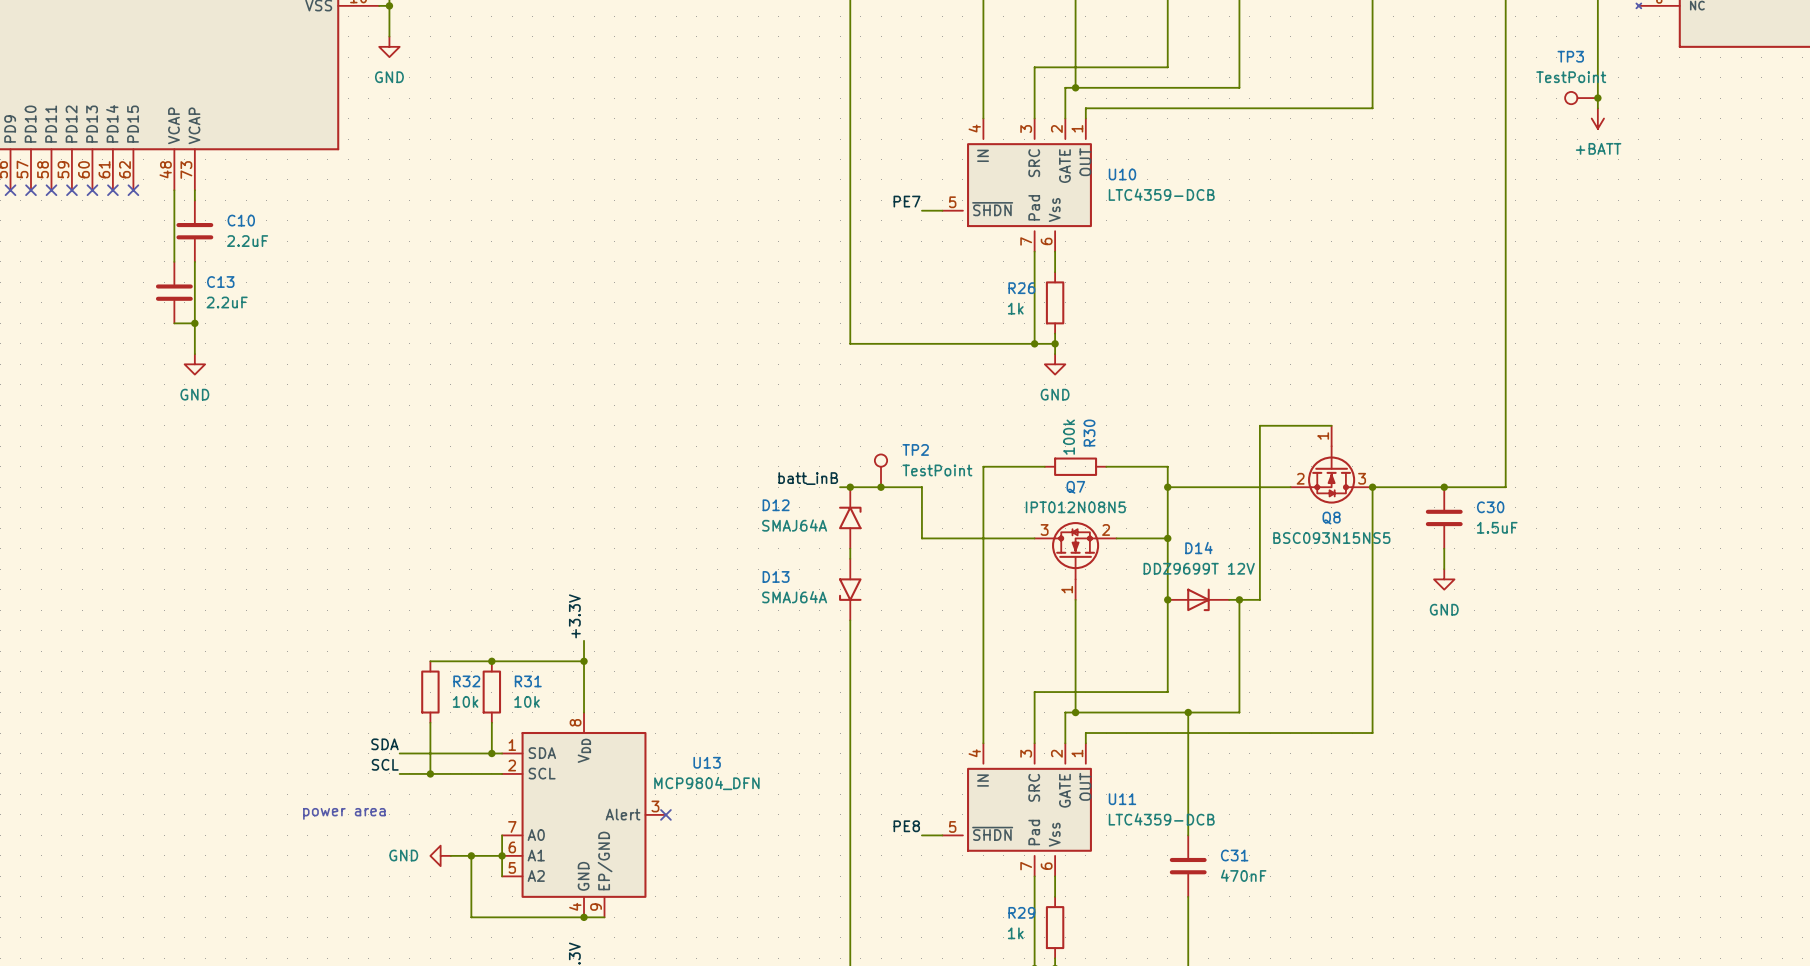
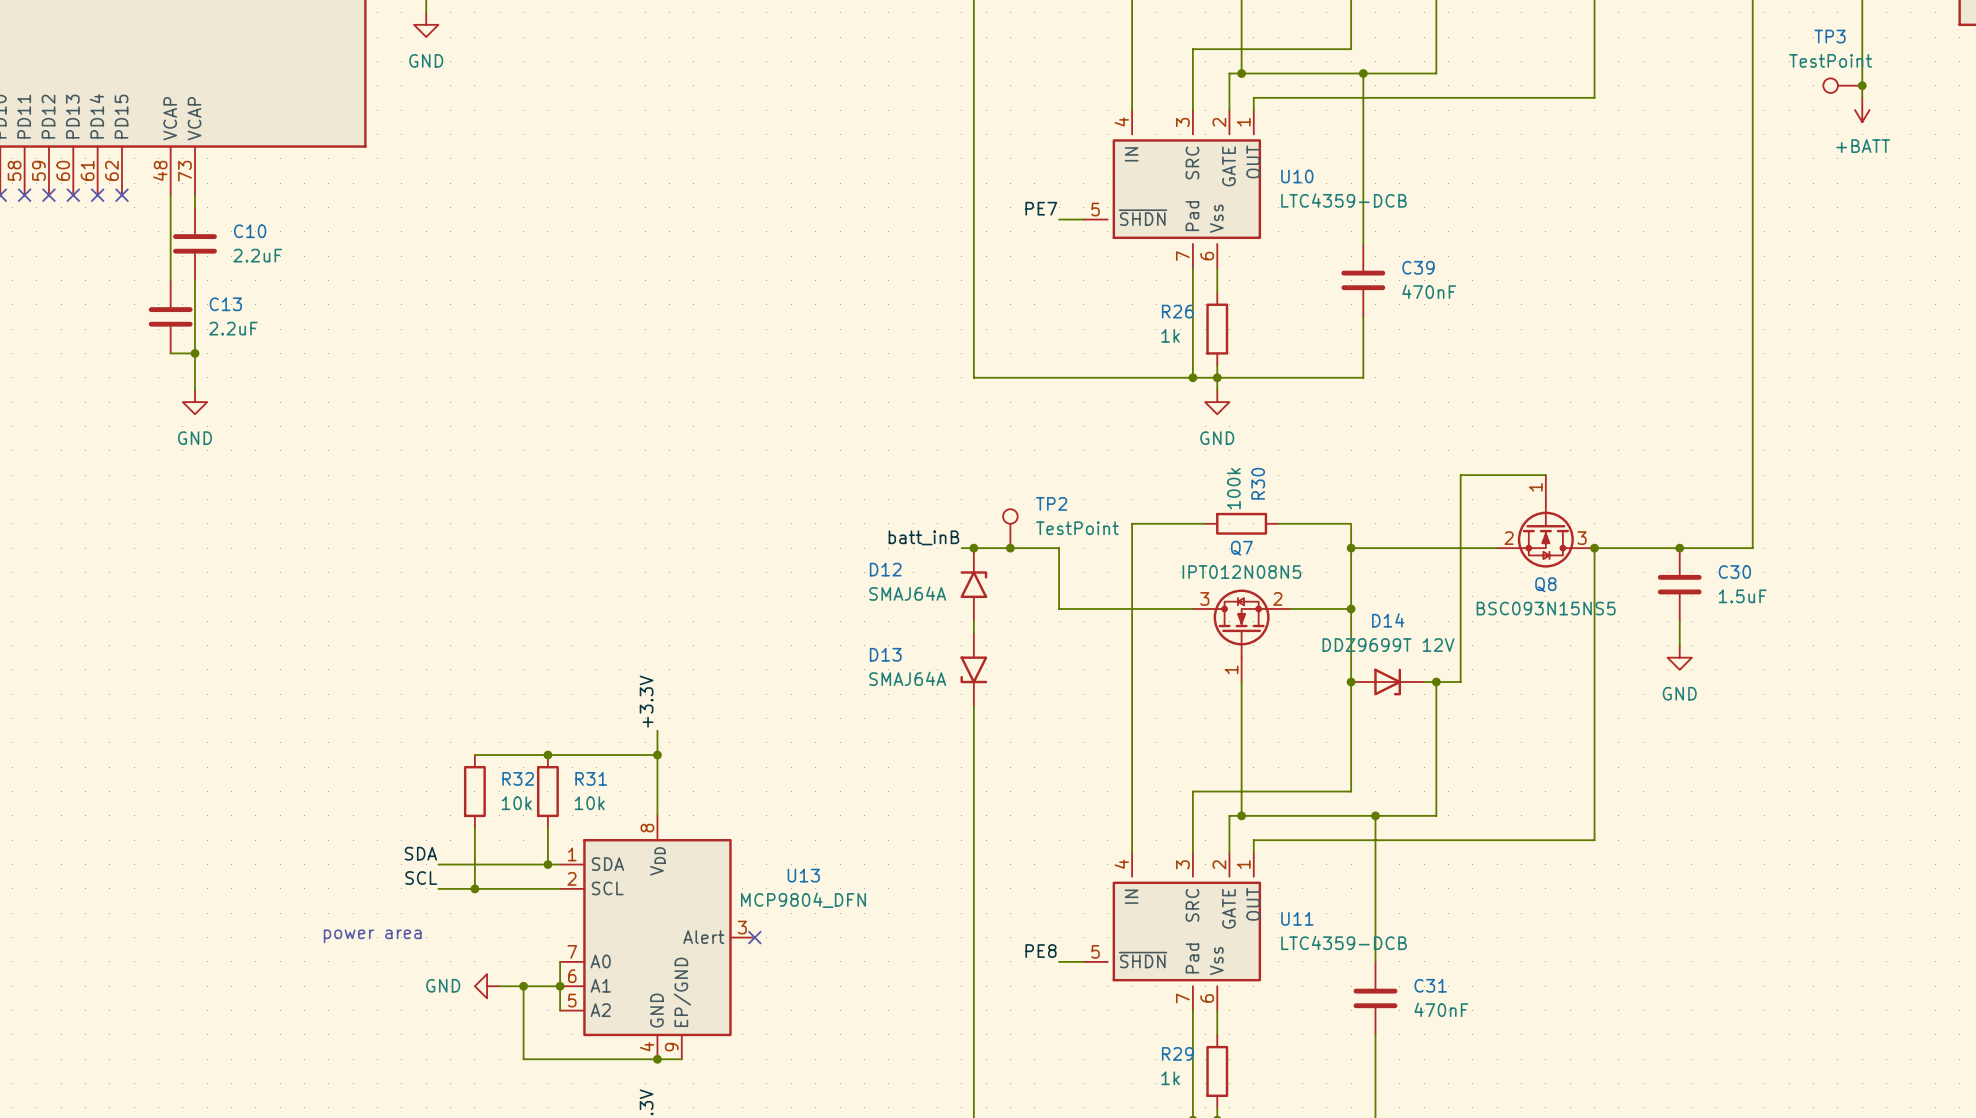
wire: none -> (1363, 73) (1363, 243)
junction: none -> (1363, 73)
C39: none -> 470nF (1363, 280)
wire: none -> (1363, 316) (1363, 377) (1217, 377)

